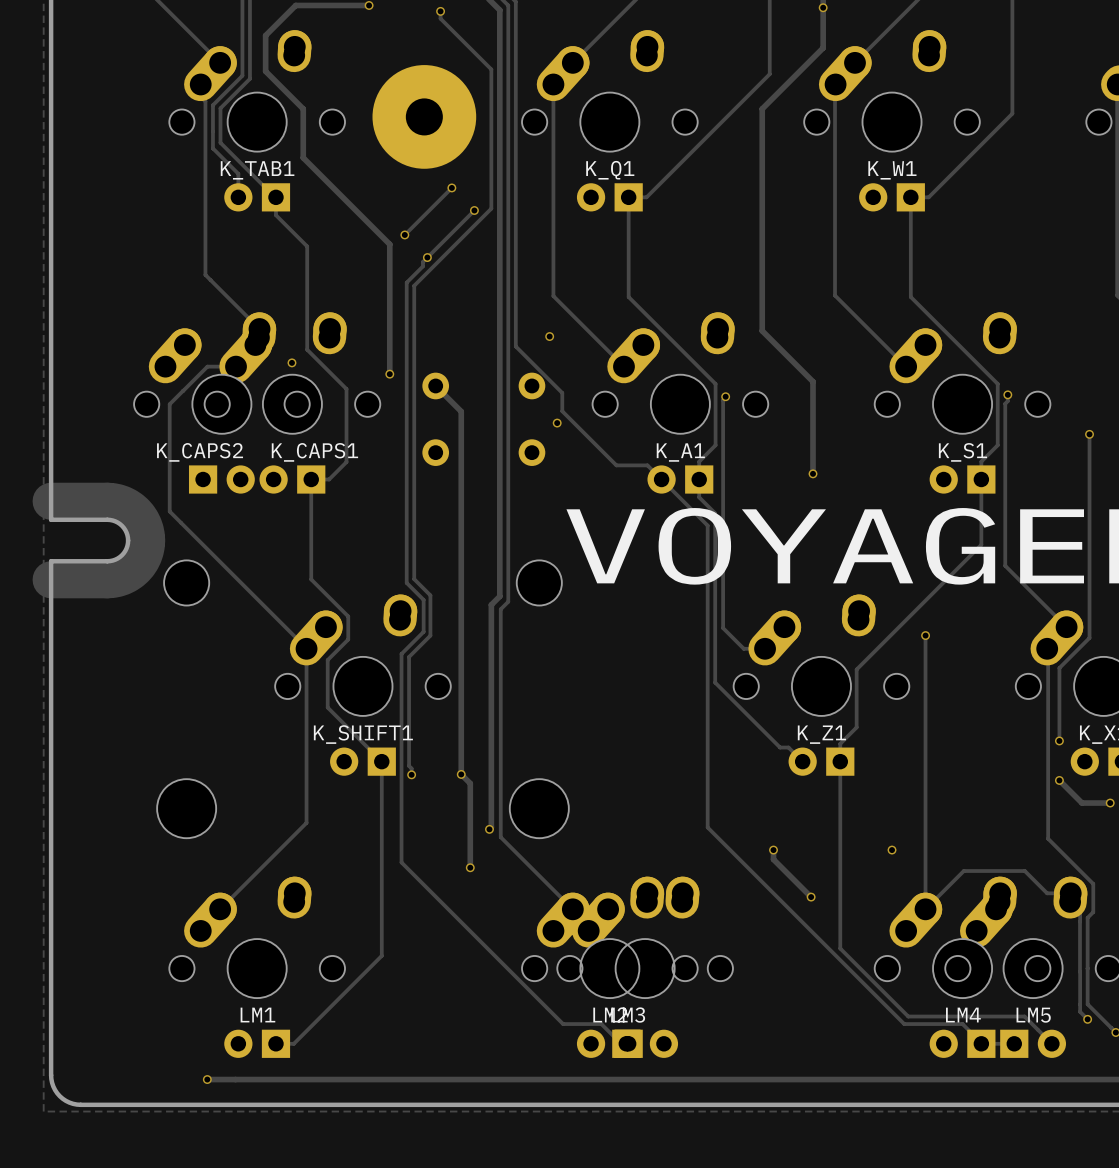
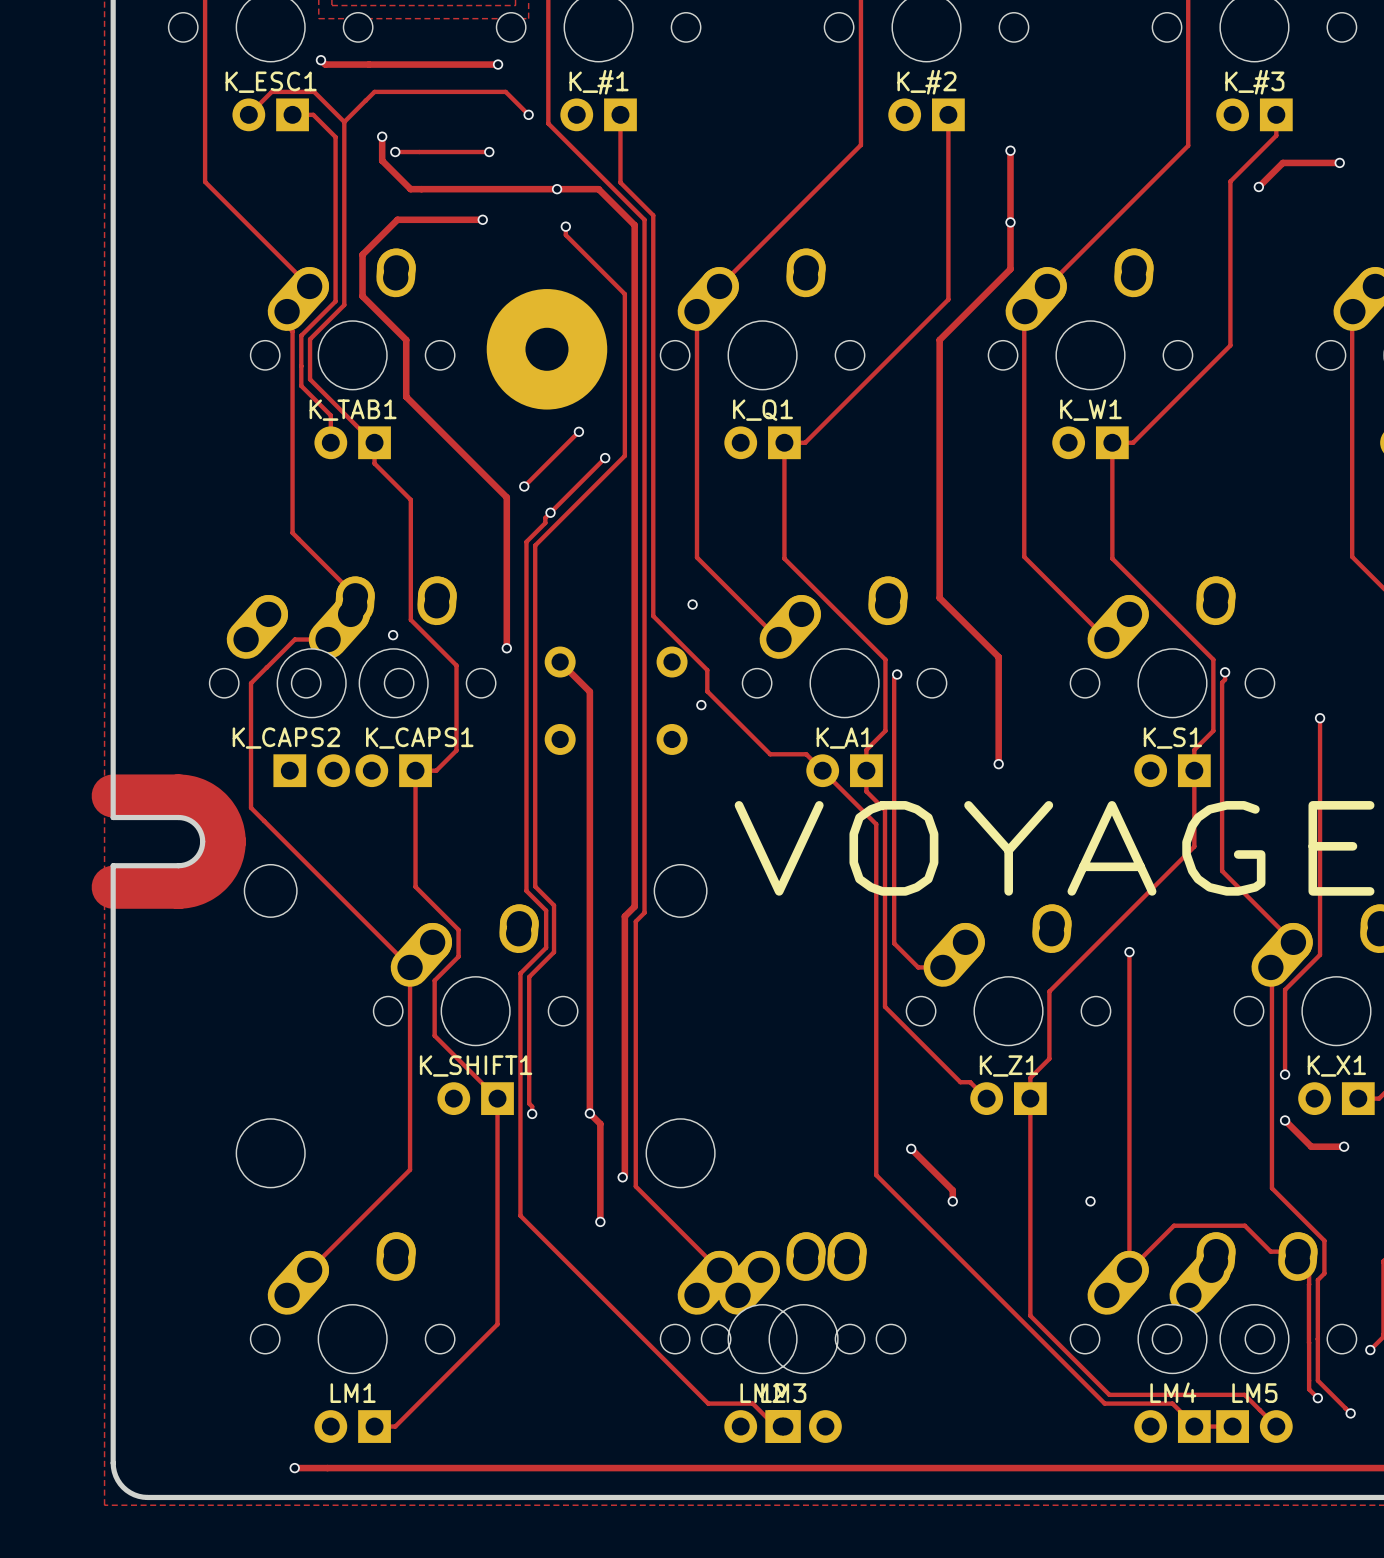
via: none -> (911, 1148)
track: (773, 850) (773, 859) (811, 897) -> (952, 1201) (952, 1190) (911, 1148)
via: (811, 897) -> none

